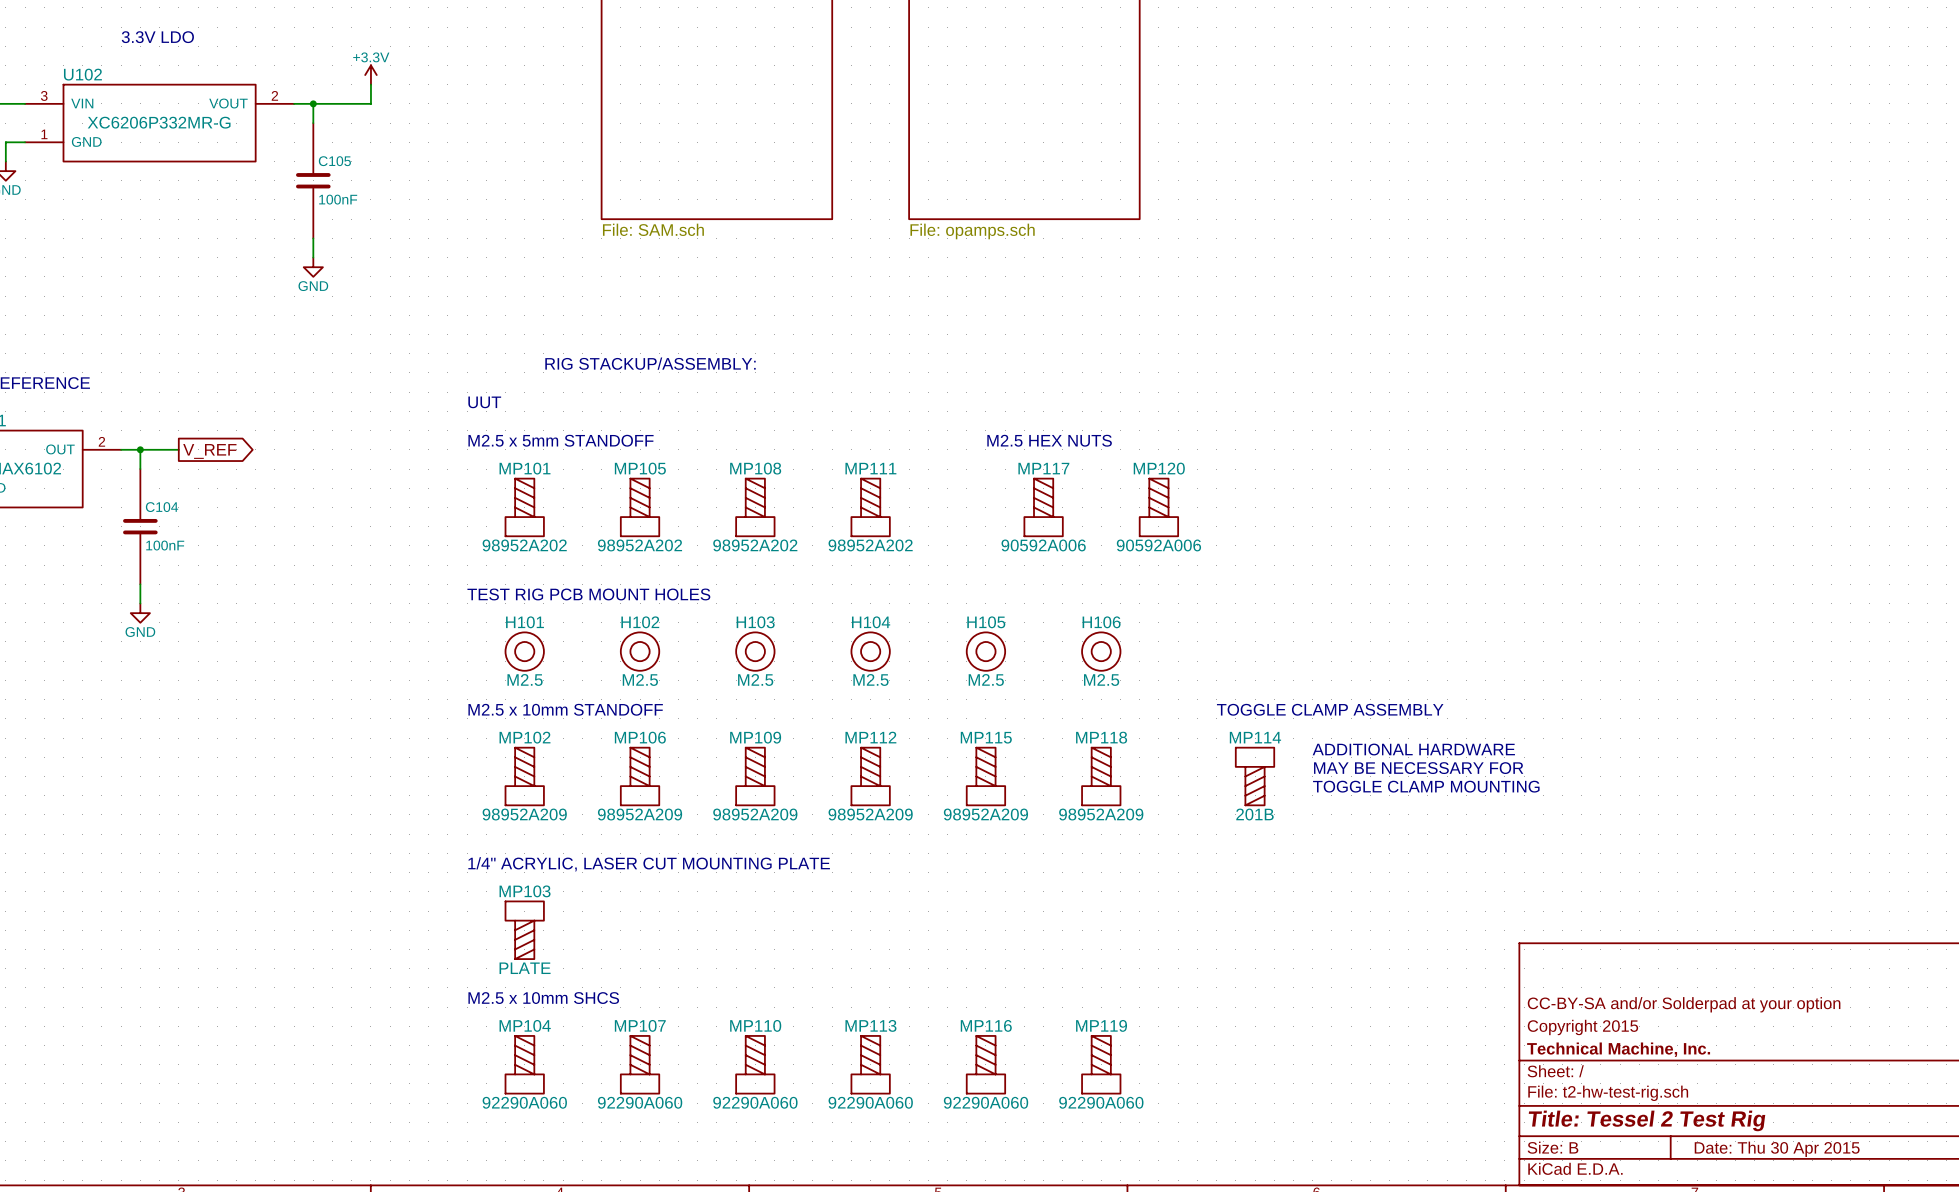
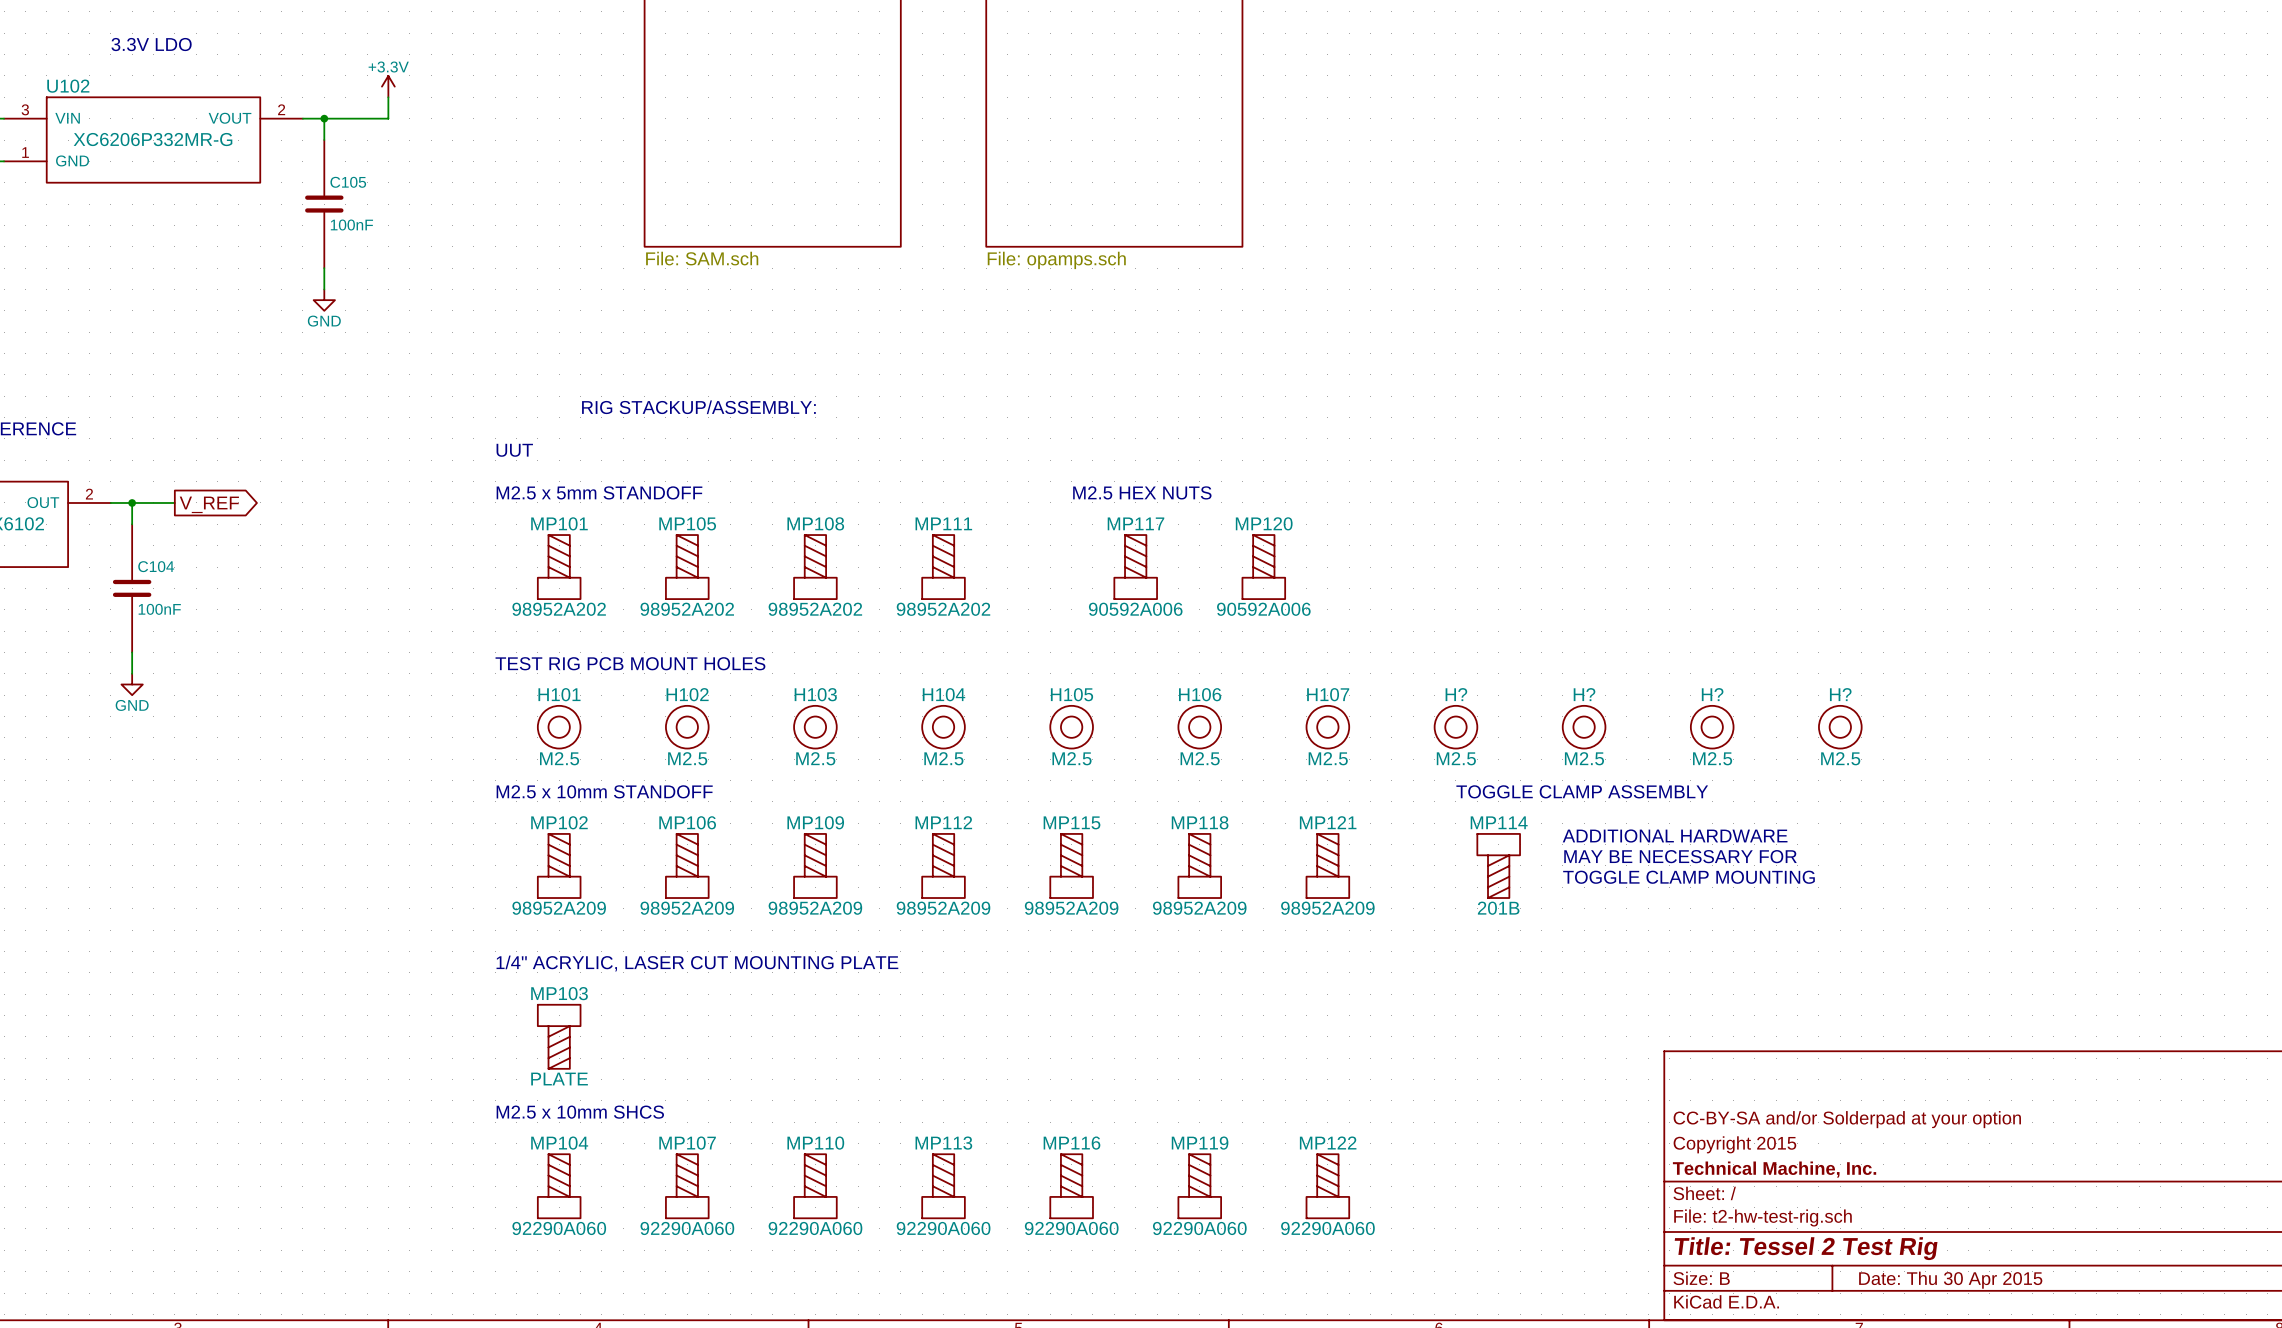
H107: none -> M2.5 (1327, 727)
H?: none -> M2.5 (1455, 727)
H?: none -> M2.5 (1584, 727)
H?: none -> M2.5 (1712, 727)
H?: none -> M2.5 (1840, 727)
text position: TOGGLE CLAMP ASSEMBLY (1330, 709) -> TOGGLE CLAMP ASSEMBLY (1582, 791)
text position: ADDITIONAL HARDWARE (1413, 749) -> ADDITIONAL HARDWARE (1675, 836)
text position: MAY BE NECESSARY FOR (1418, 768) -> MAY BE NECESSARY FOR (1680, 856)
MP121: none -> 98952A209 (1327, 865)
MP114 position: (1255, 776) -> (1498, 865)
text position: TOGGLE CLAMP MOUNTING (1426, 786) -> TOGGLE CLAMP MOUNTING (1688, 877)
MP122: none -> 92290A060 (1327, 1186)

